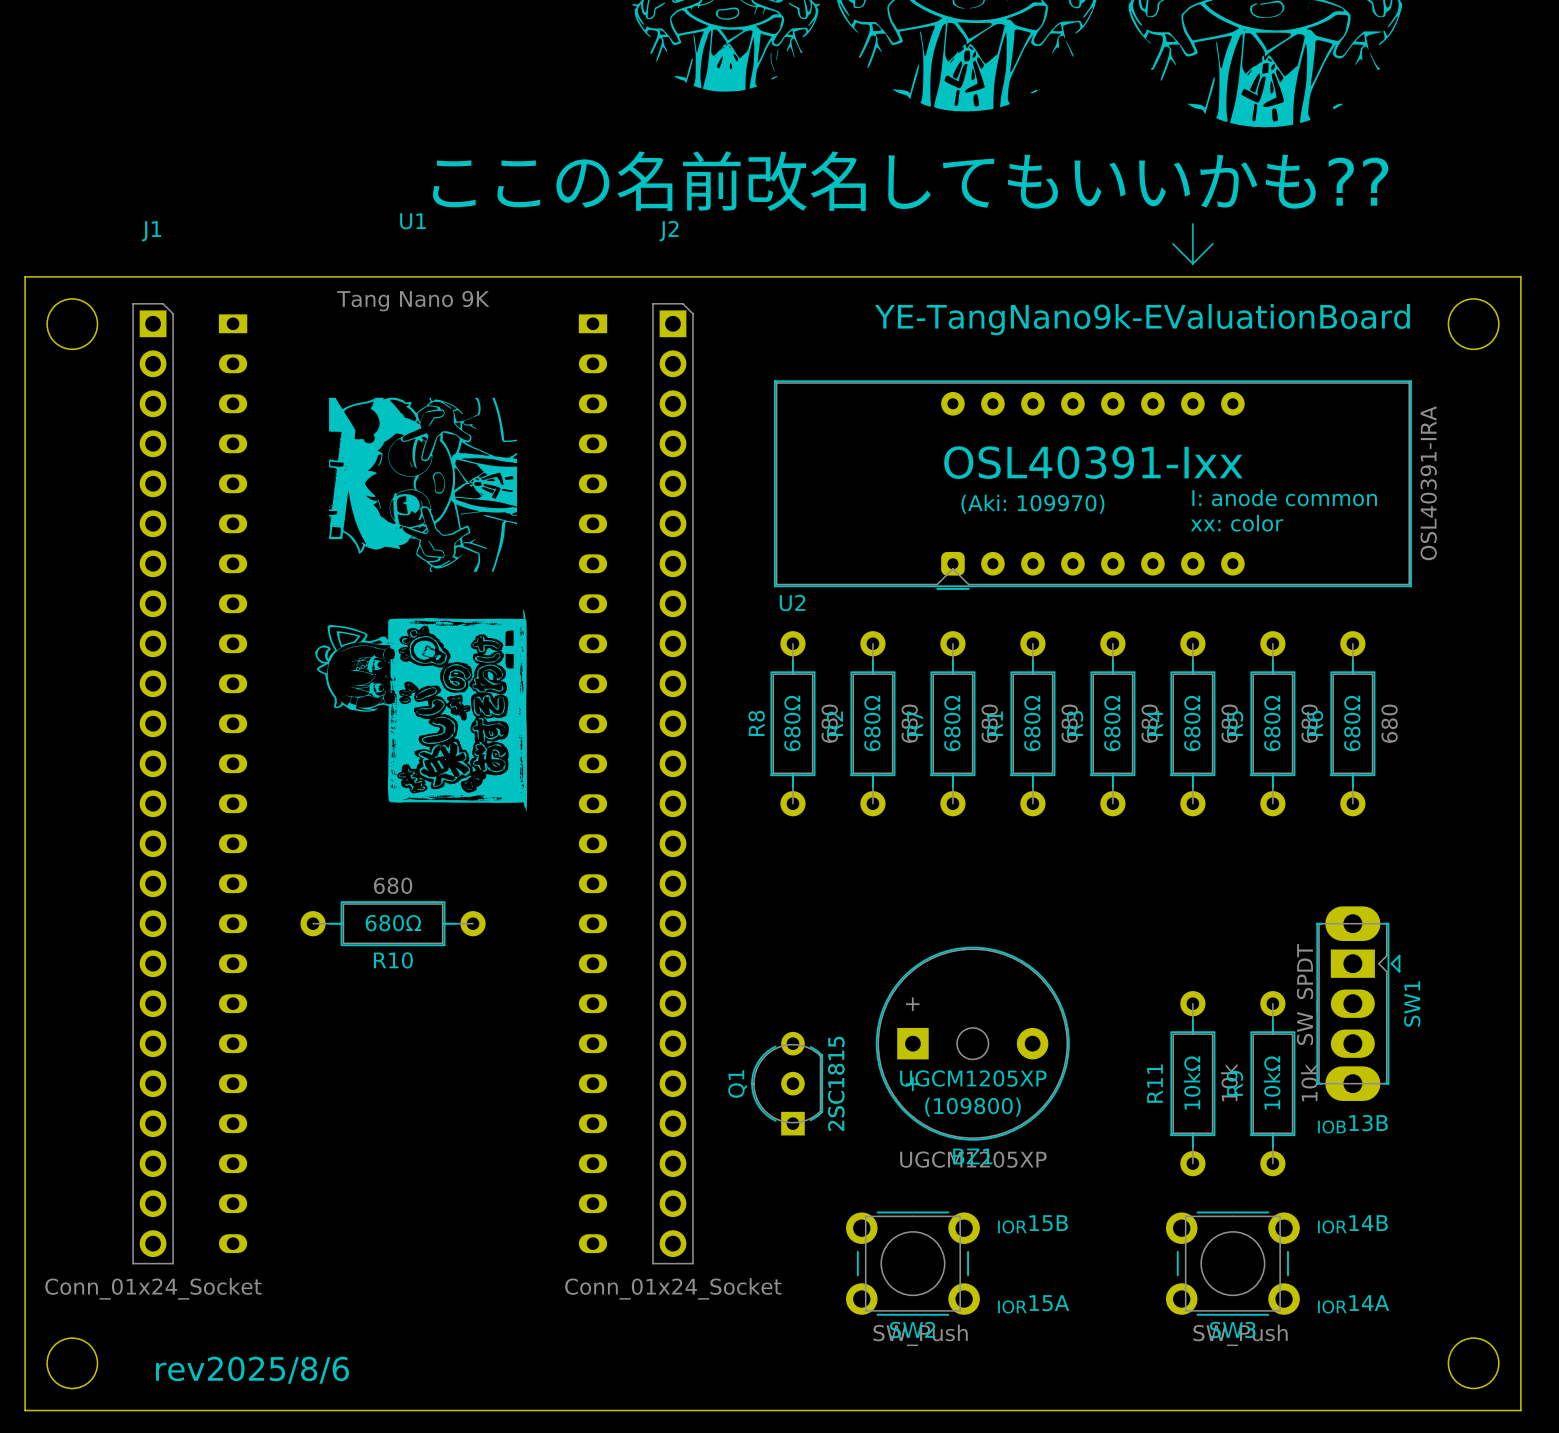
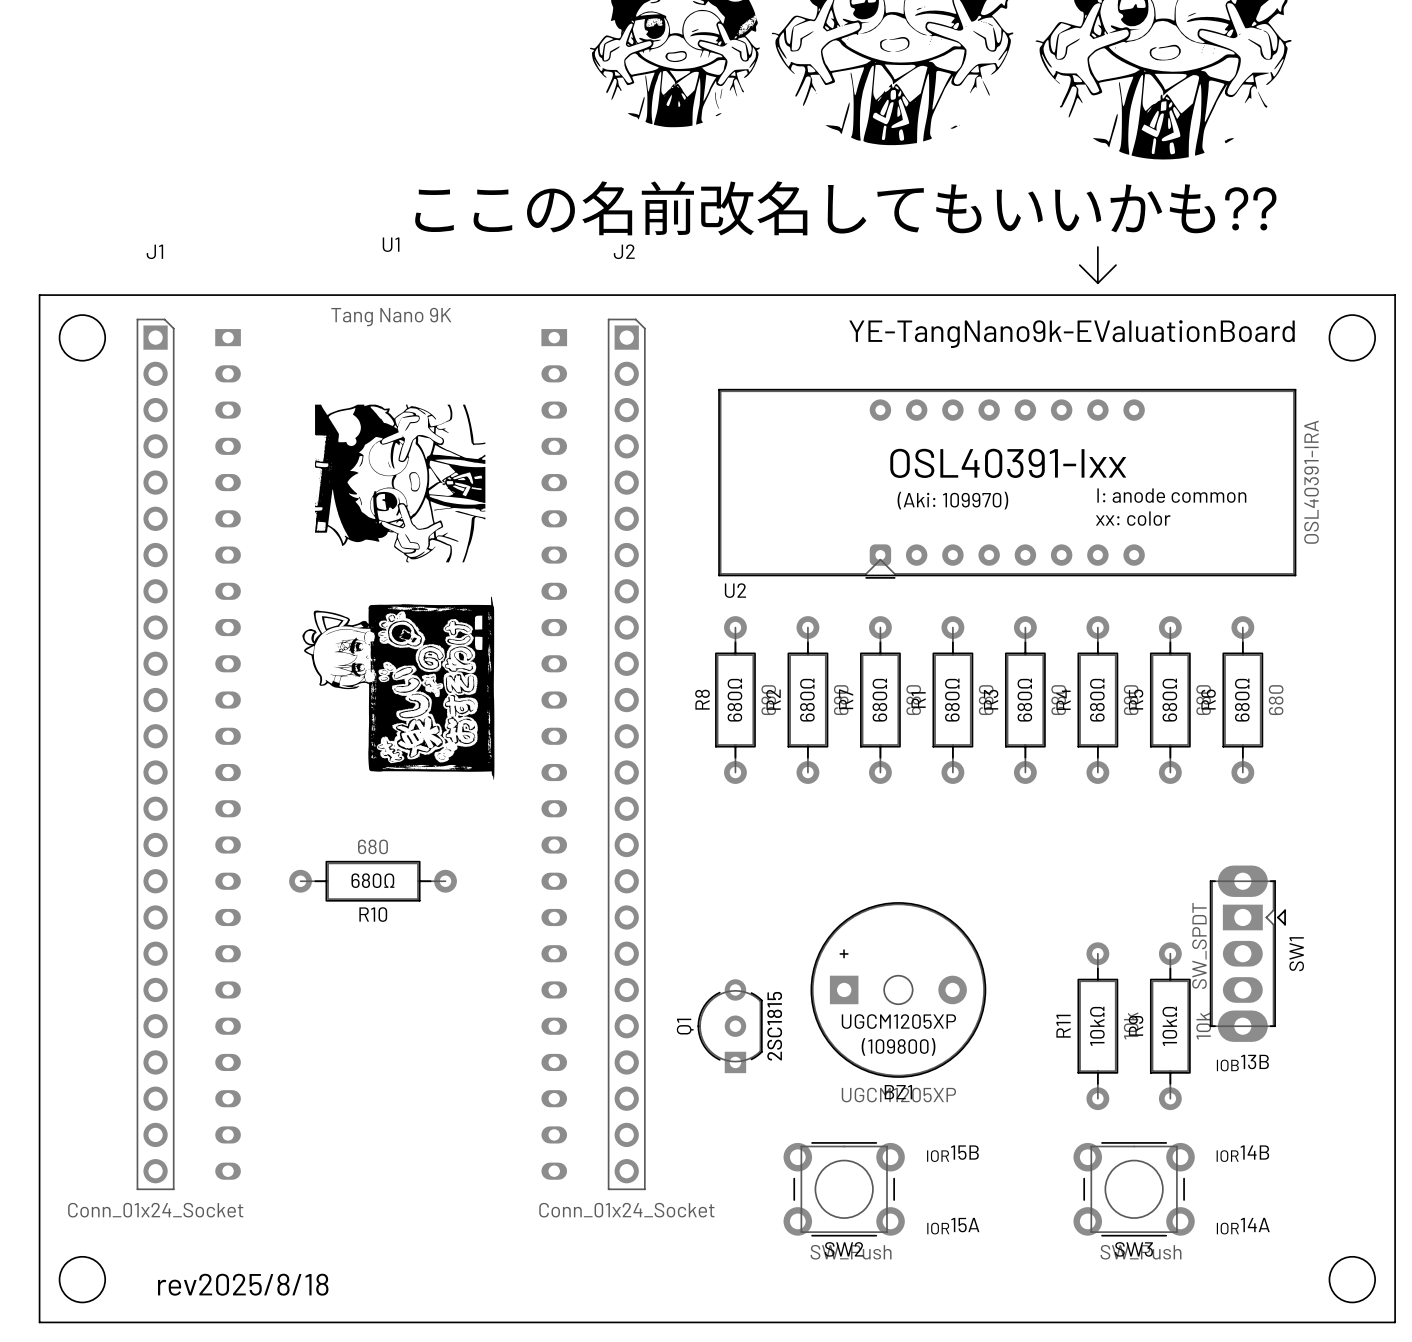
BZ1 footprint: [875, 946, 1070, 1141] -> [810, 902, 987, 1078]
text: rev2025/8/6 (252, 1370) -> rev2025/8/18 (243, 1284)

